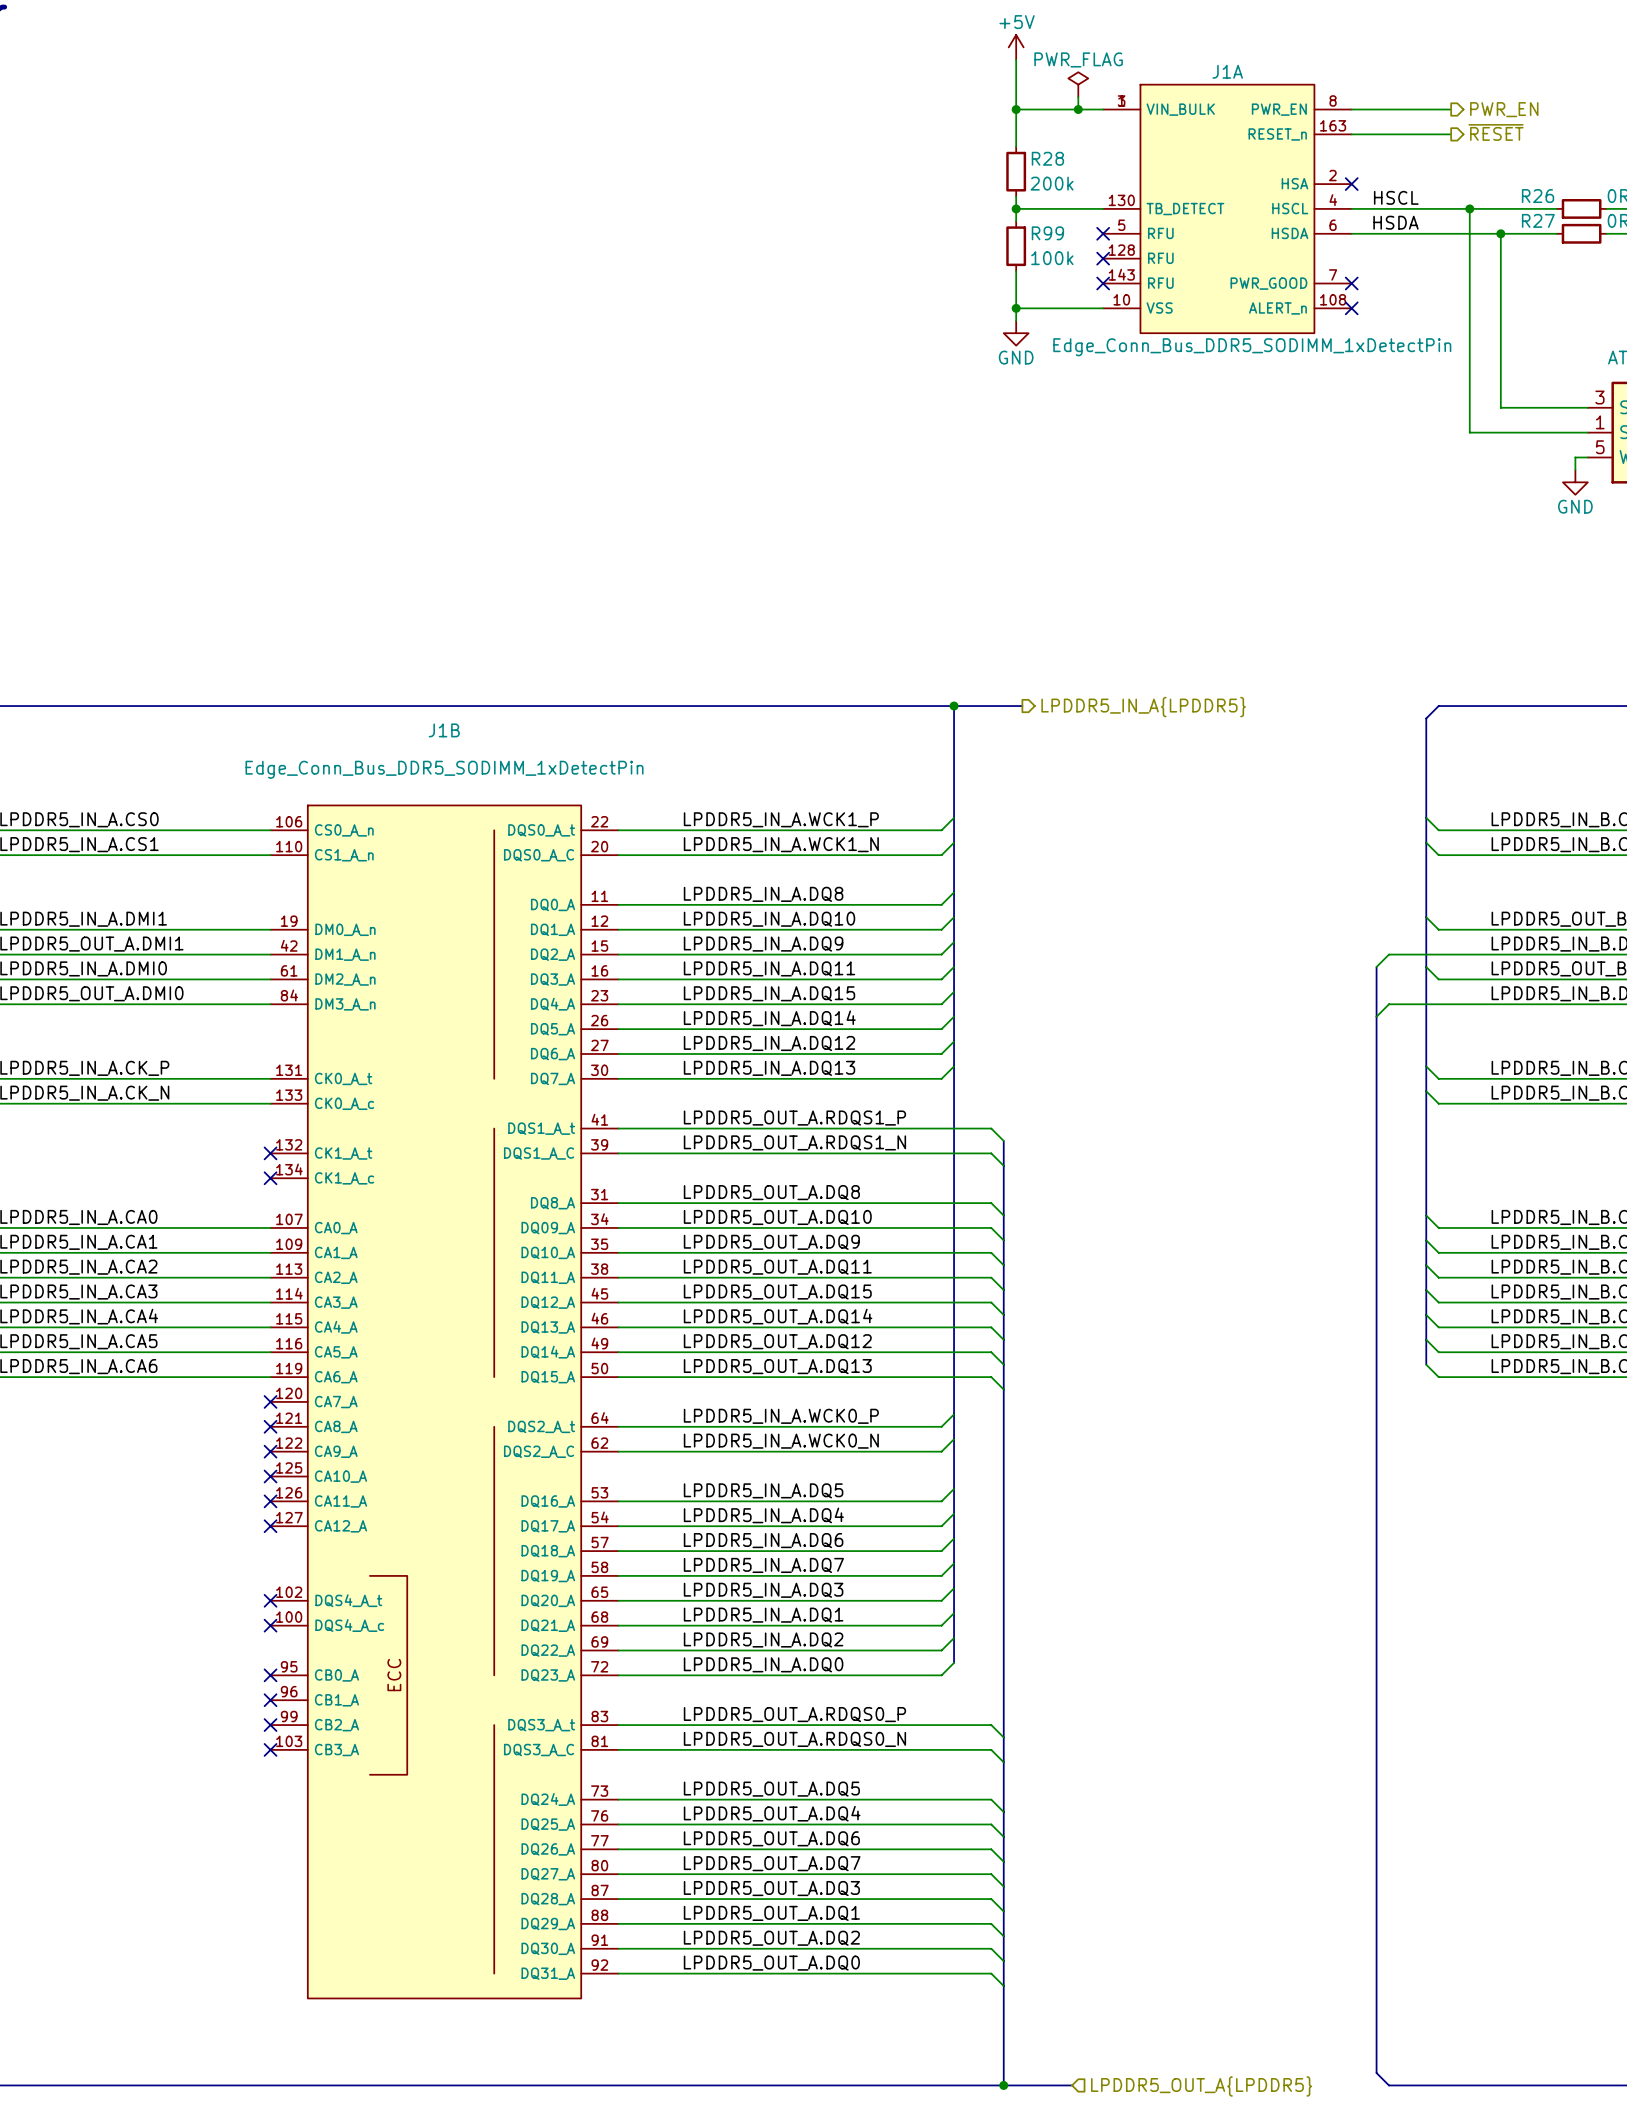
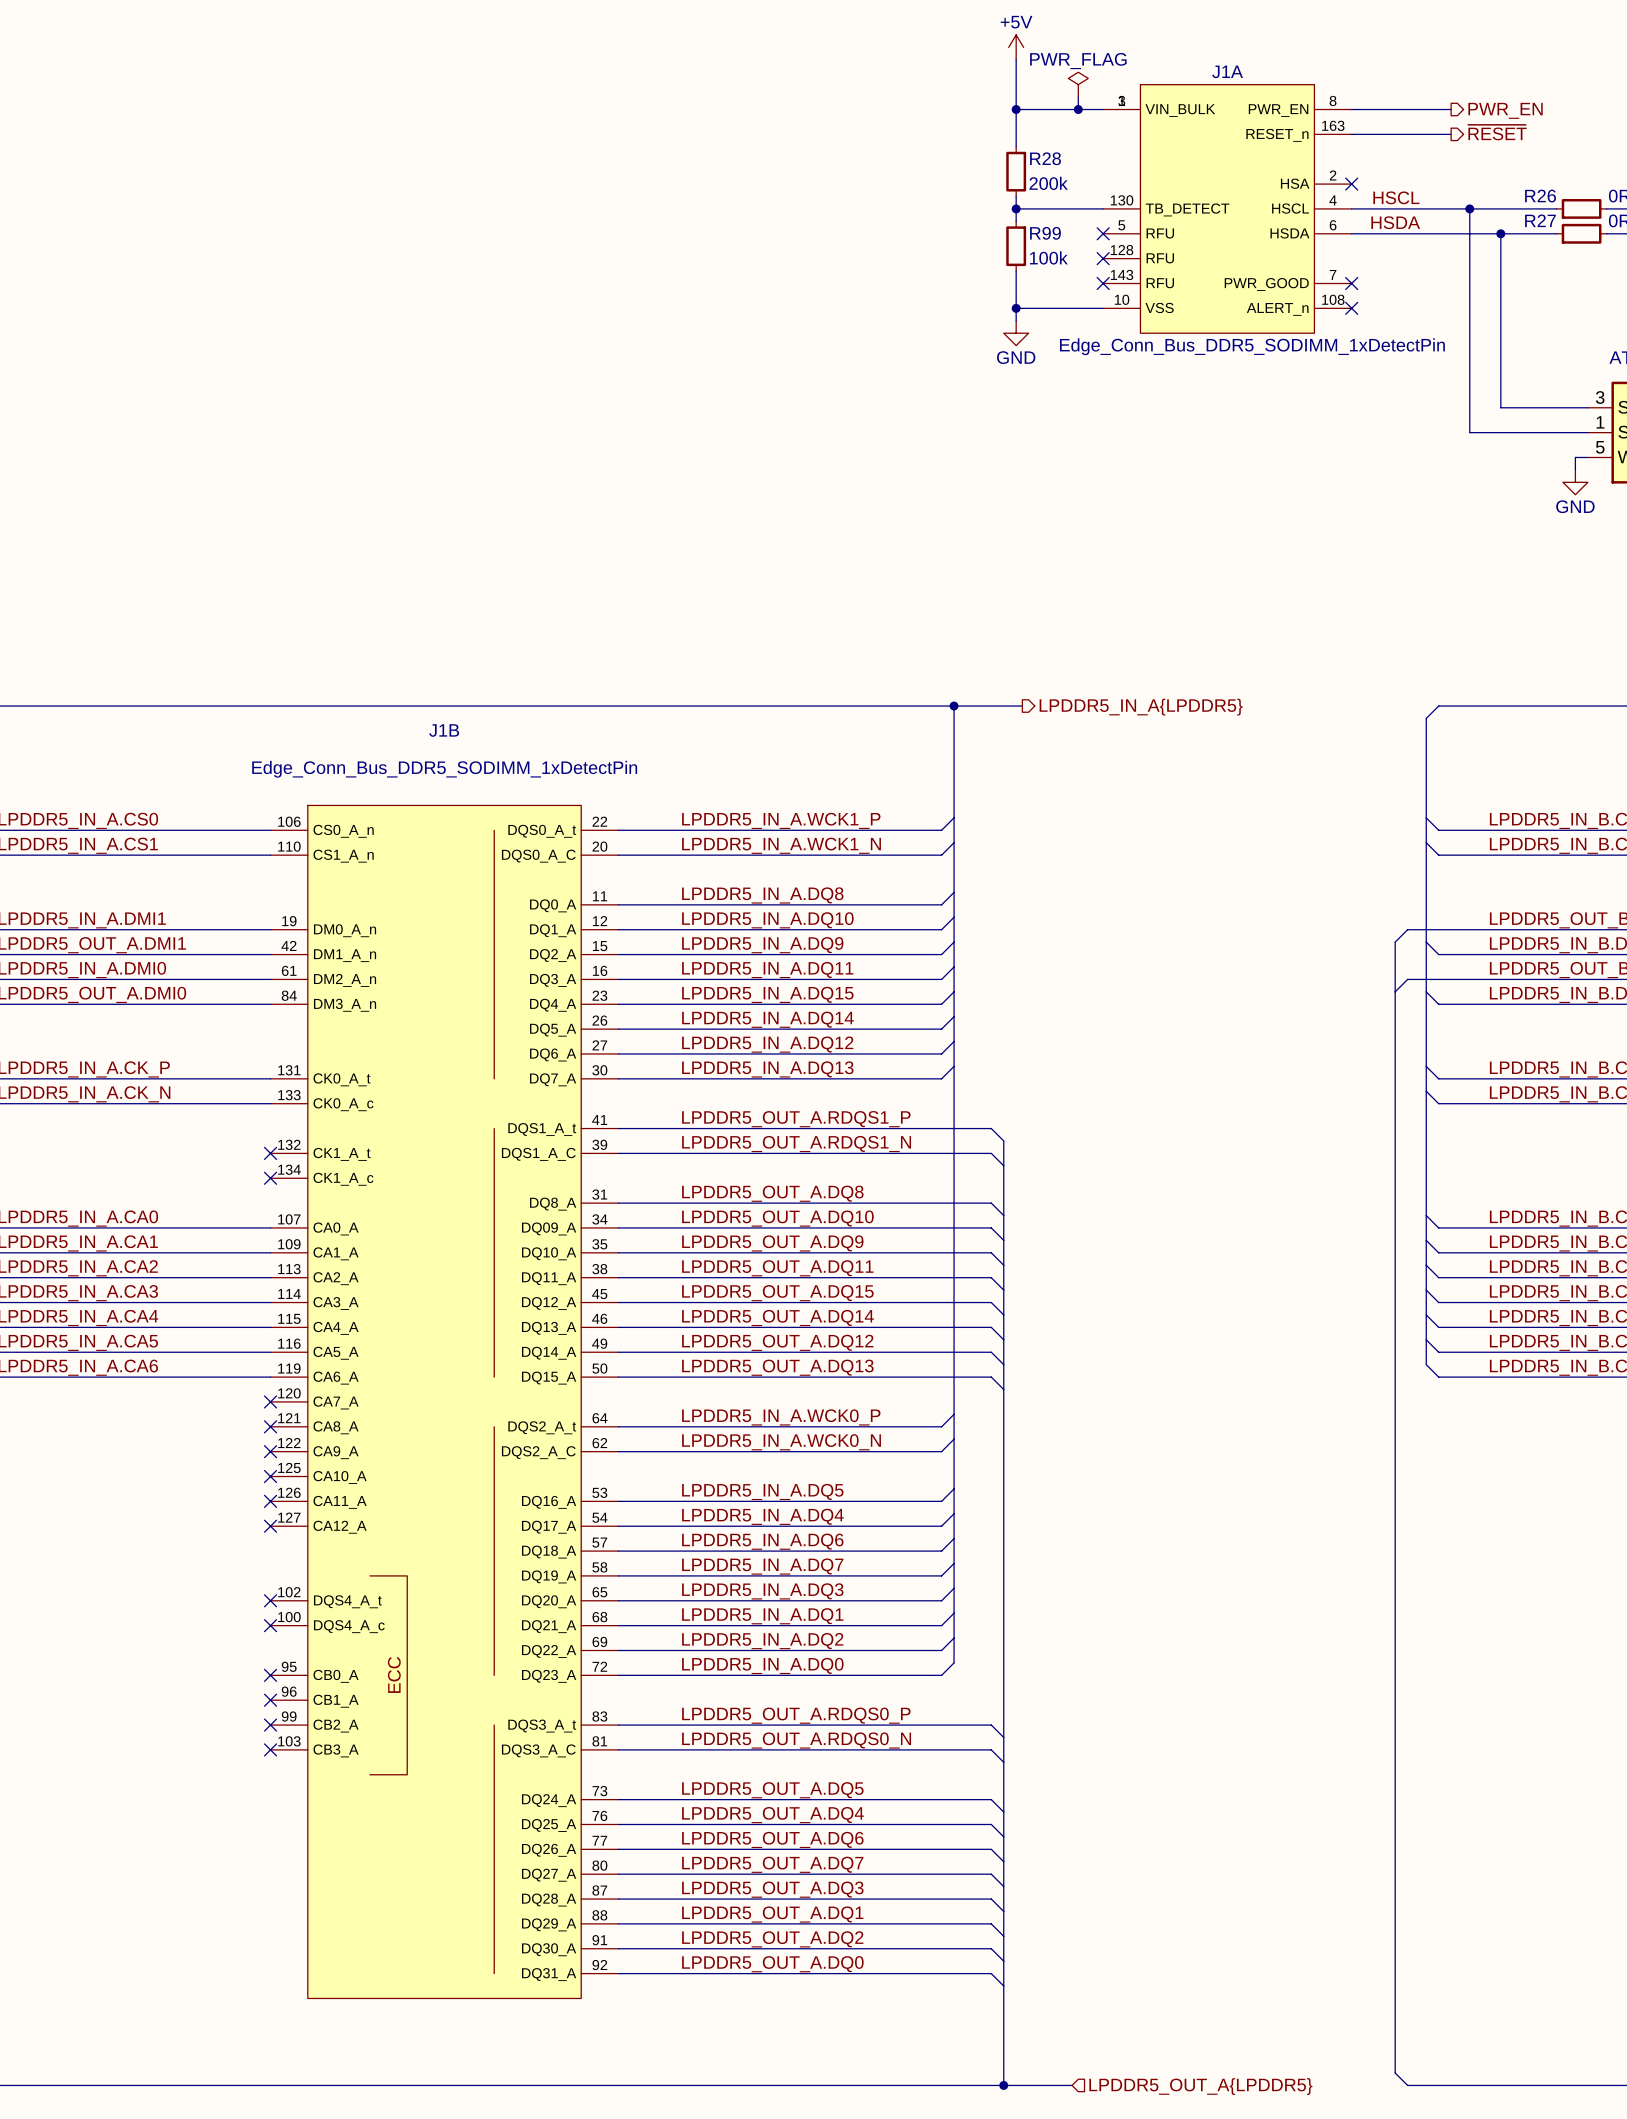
wire: (1426, 917) (1438, 929) -> (1395, 942) (1407, 929) (1438, 929)
wire: (1438, 954) (1388, 954) (1376, 967) -> (1438, 954) (1426, 942)
bus: (1376, 967) (1376, 2073) (1388, 2085) (1407, 2085) -> (1395, 942) (1395, 2073) (1407, 2085)
wire: (1426, 967) (1438, 979) -> (1395, 991) (1407, 979) (1438, 979)
wire: (1438, 1004) (1388, 1004) (1376, 1016) -> (1438, 1004) (1426, 991)

